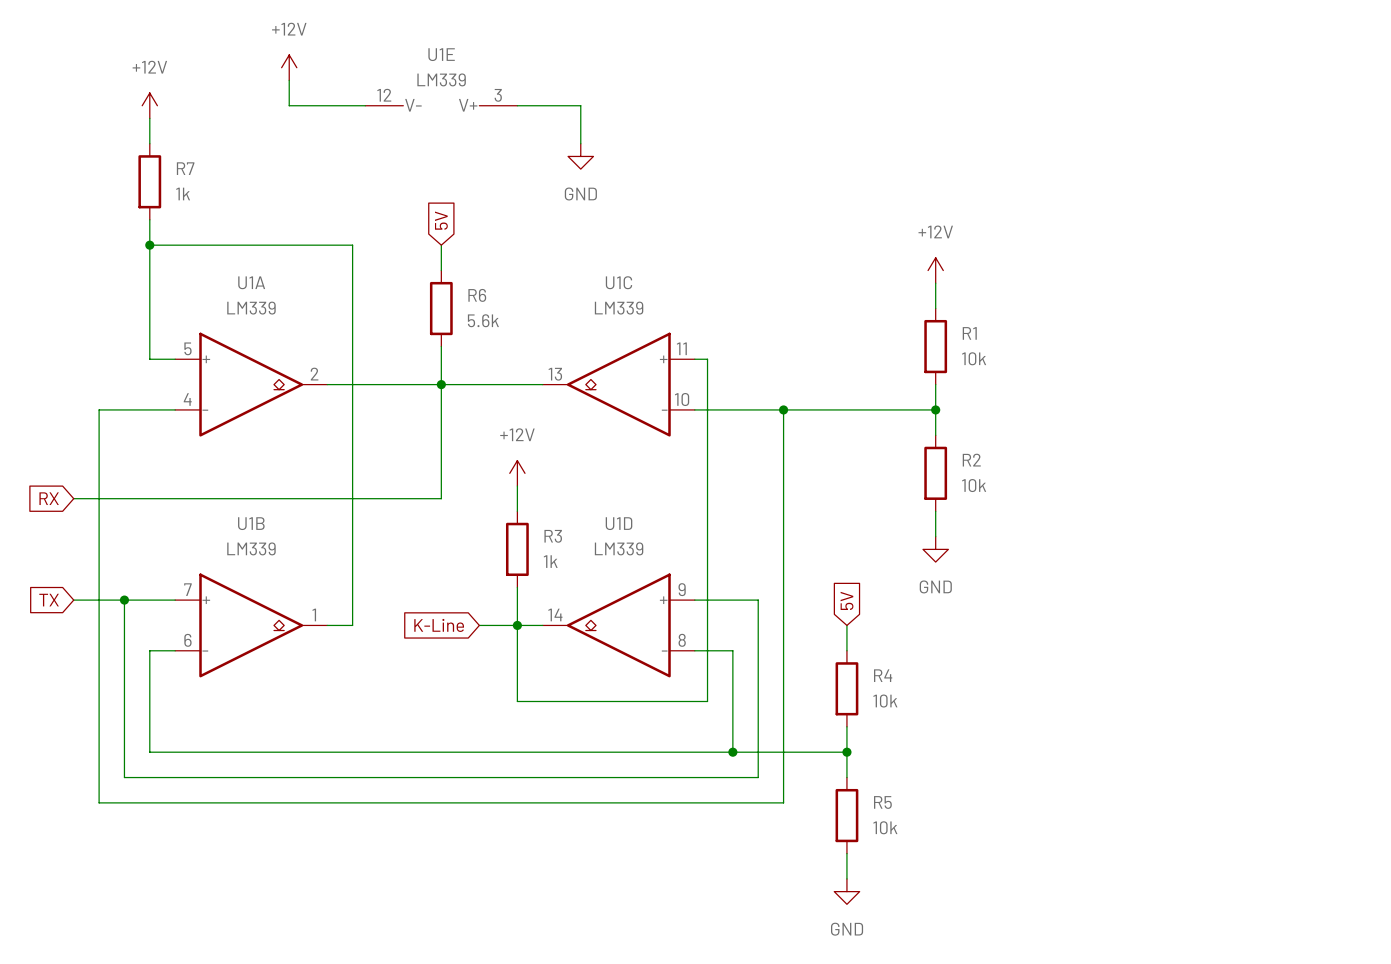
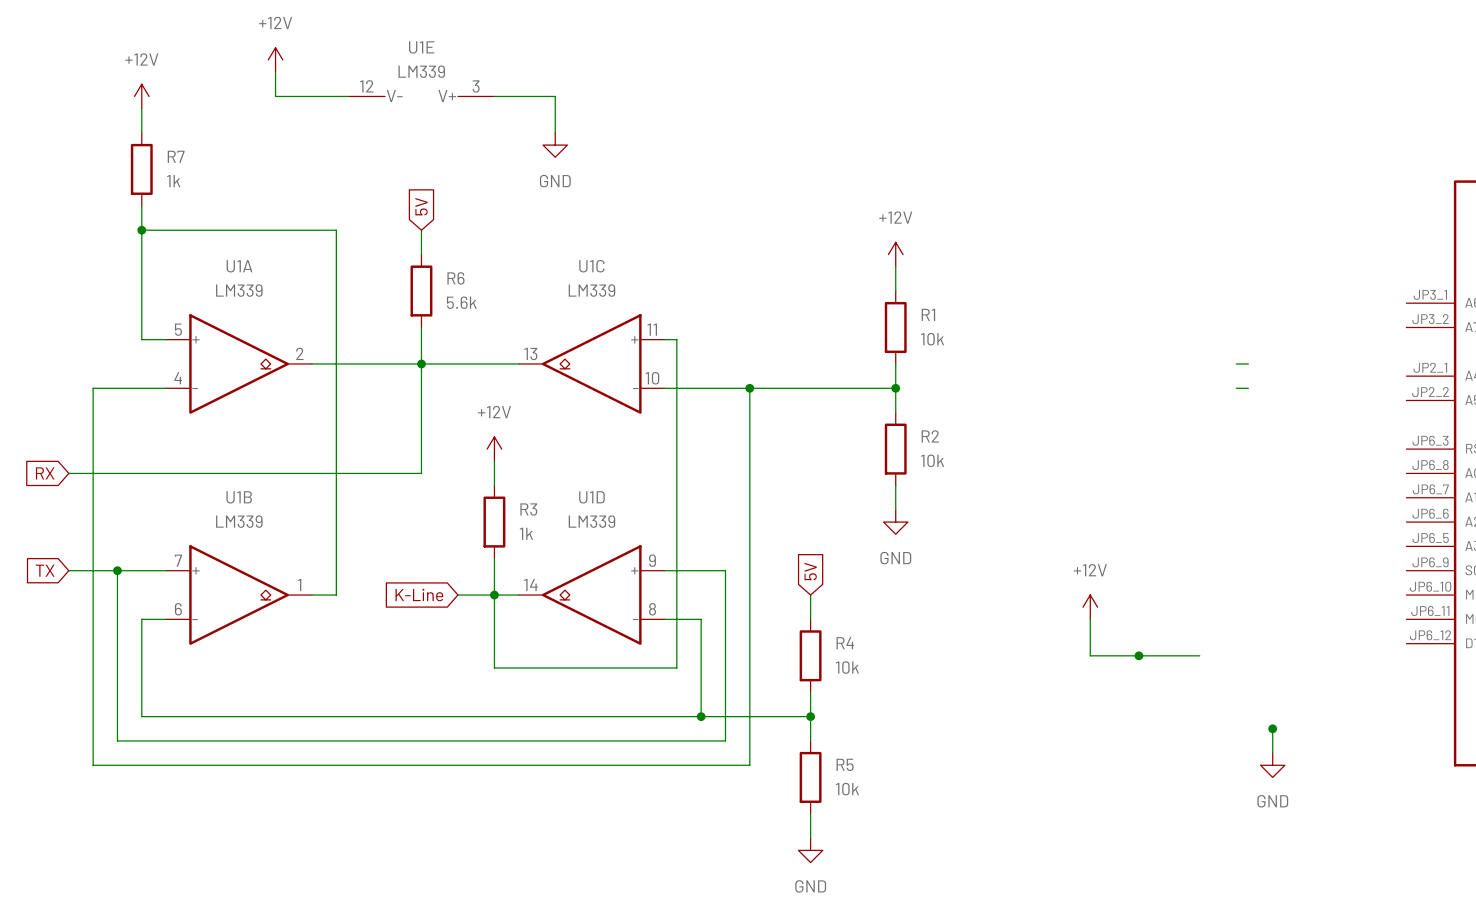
wire: none -> (1236, 363) (1248, 363)
wire: none -> (1236, 388) (1248, 388)
power symbol: none -> +12V (1090, 607)
wire: none -> (1090, 619) (1090, 655) (1199, 655)
junction: none -> (1138, 655)
wire: none -> (1272, 728) (1272, 753)
junction: none -> (1272, 728)
power symbol: none -> GND (1272, 765)

